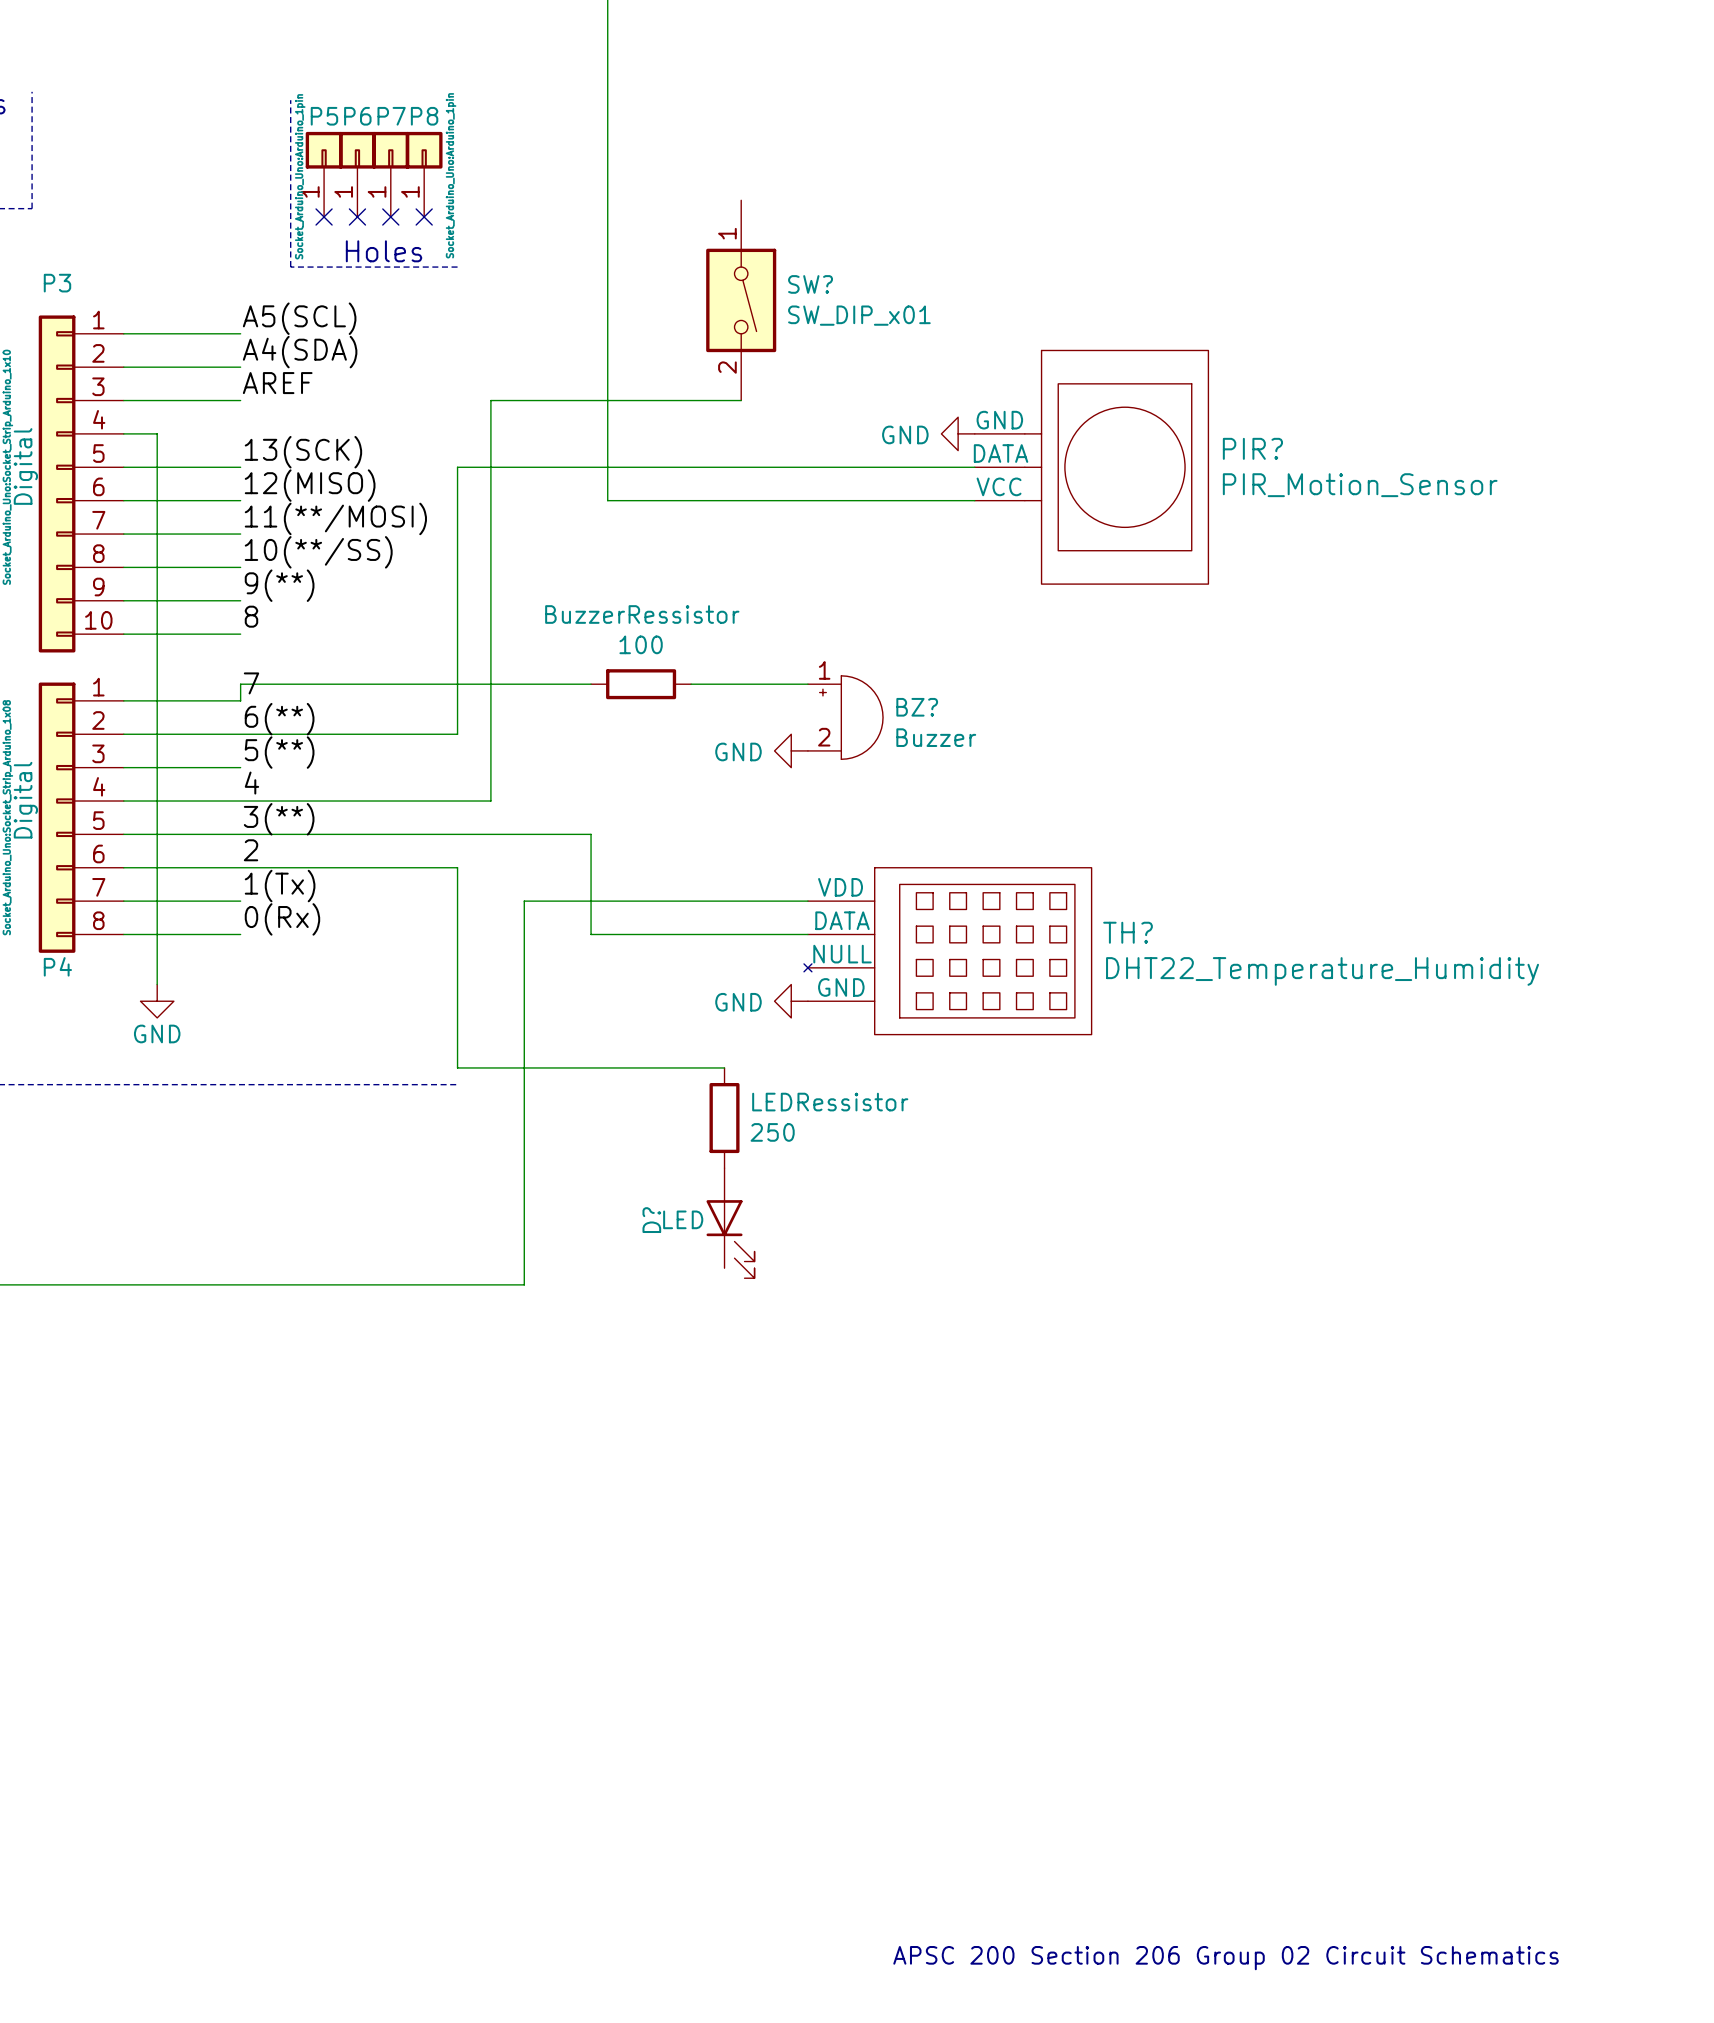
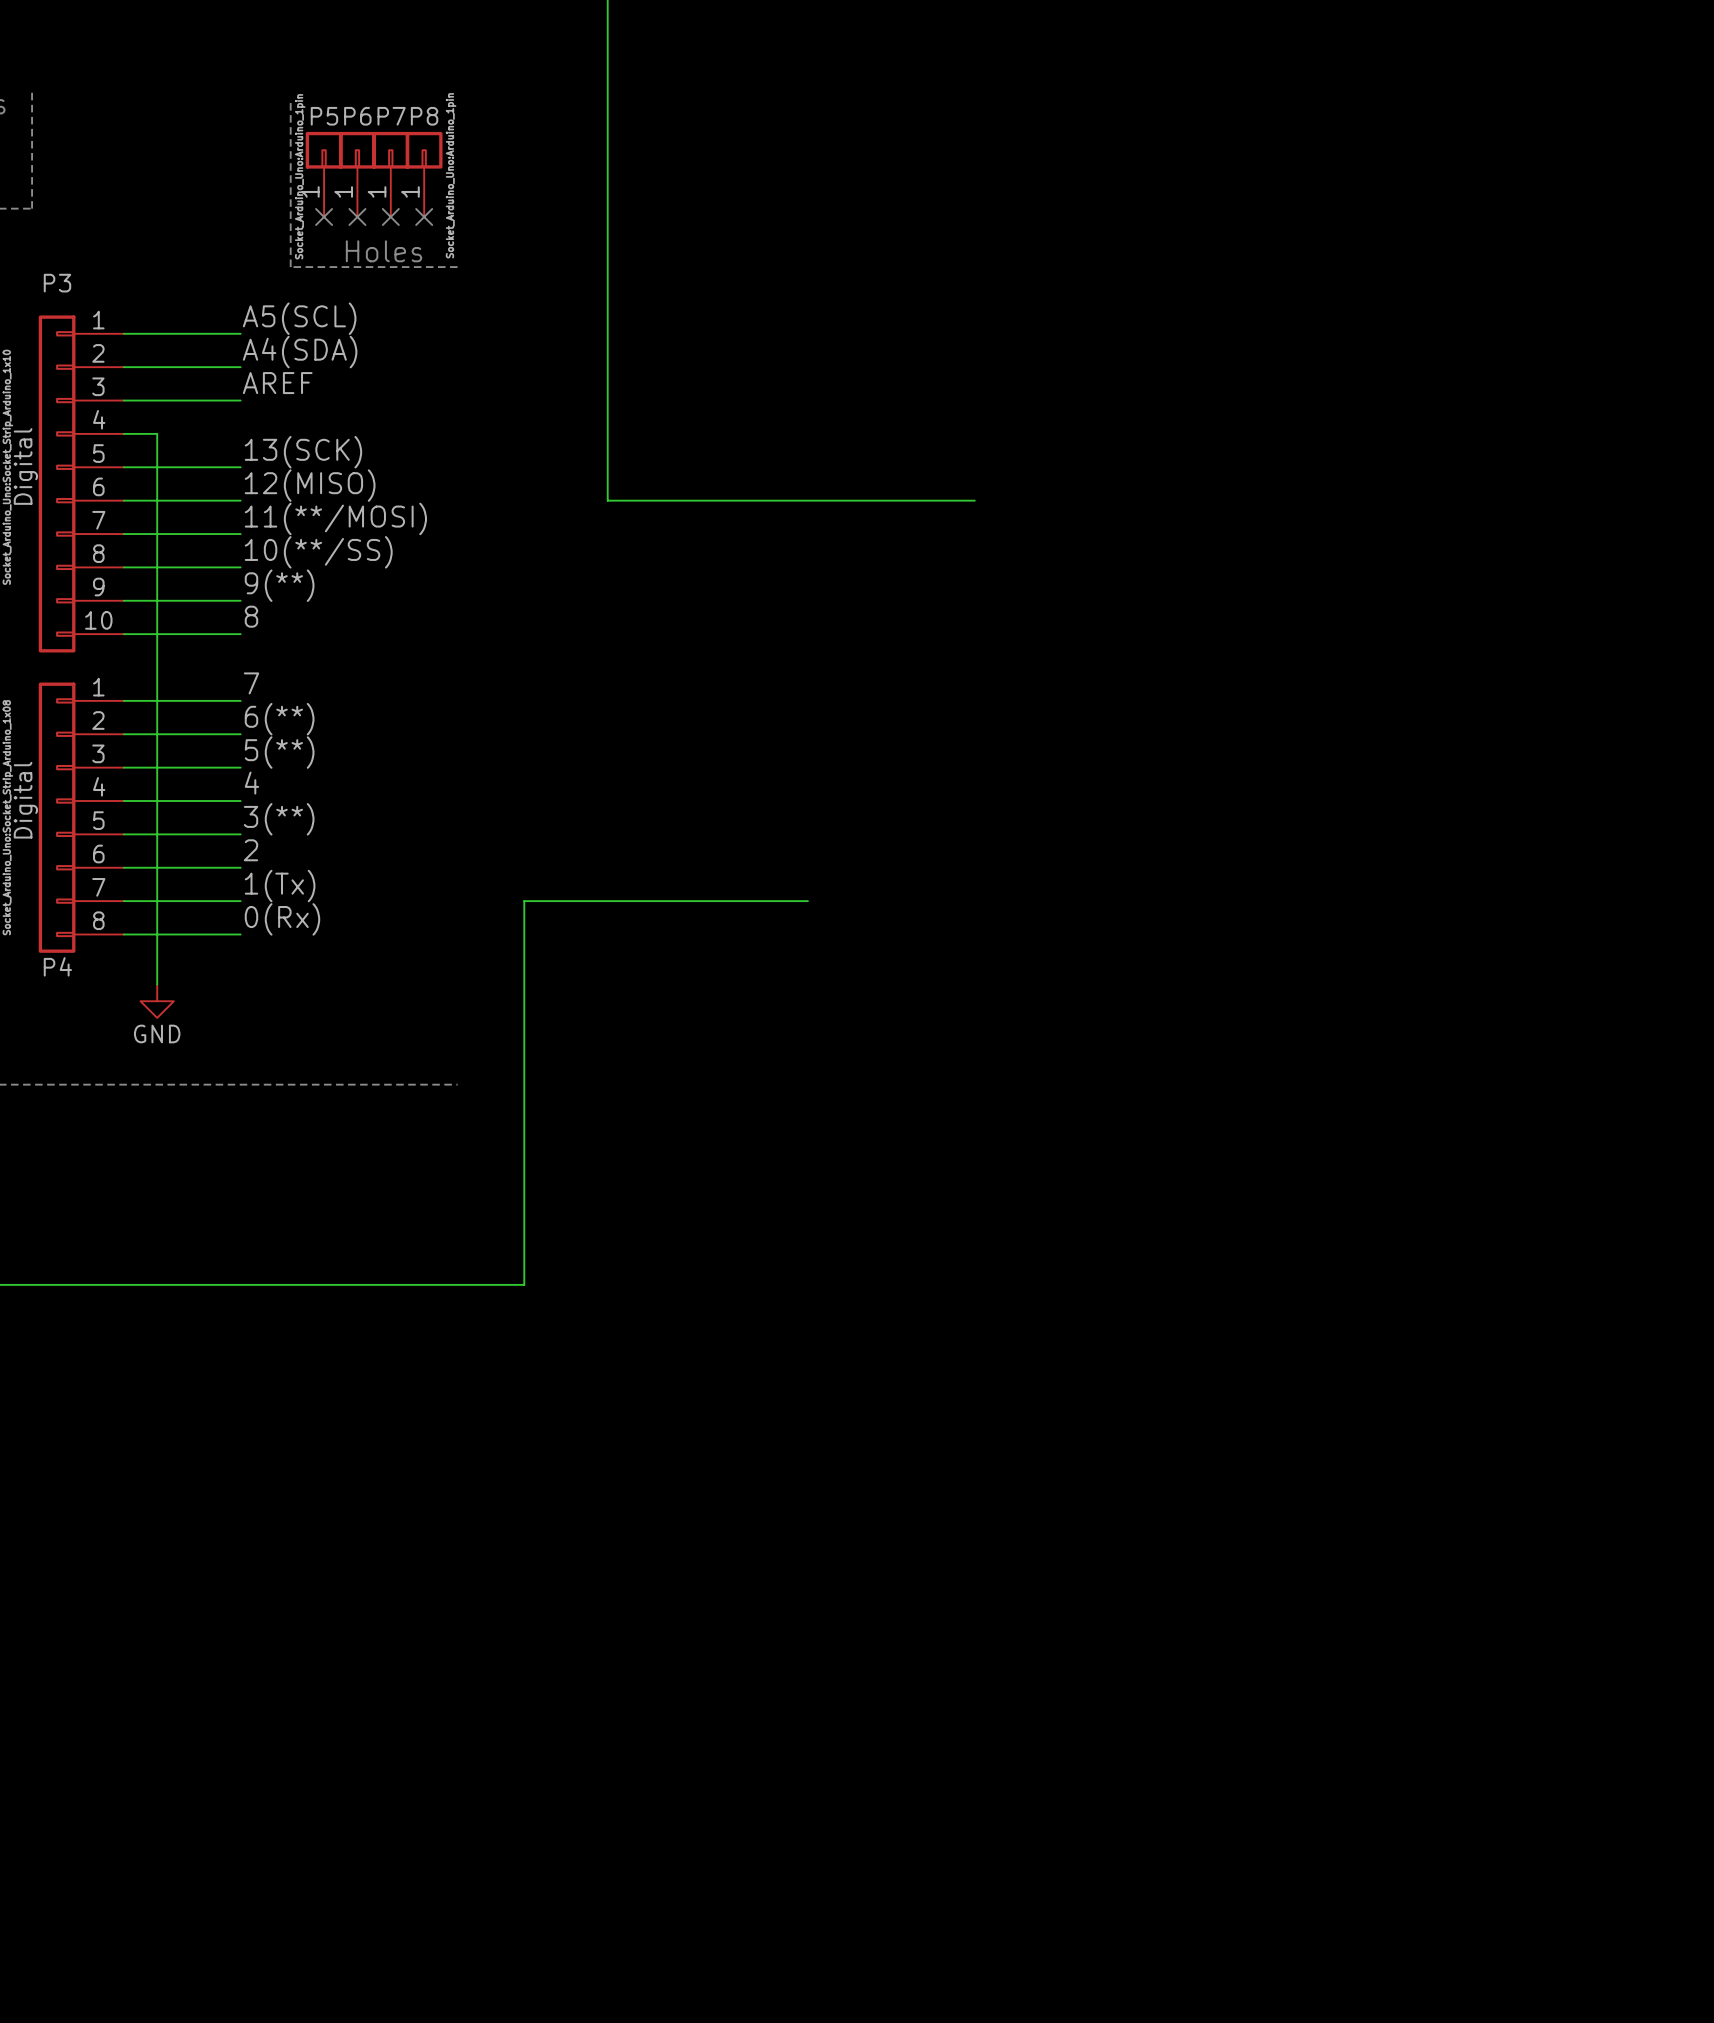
SW?: SW_DIP_x01 (741, 300) -> none
wire: (741, 400) (490, 400) (490, 801) (240, 801) -> none
power symbol: GND (958, 433) -> none
wire: (974, 467) (457, 467) (457, 734) (240, 734) -> none
PIR?: PIR_Motion_Sensor (1091, 467) -> none
wire: (591, 684) (240, 684) (240, 700) -> none
BuzzerRessistor: 100 (641, 684) -> none
wire: (691, 684) (807, 684) -> none
BZ?: Buzzer (845, 717) -> none
power symbol: GND (791, 750) -> none
wire: (240, 834) (591, 834) (591, 934) (807, 934) -> none
wire: (240, 867) (457, 867) (457, 1067) (724, 1067) -> none
TH?: DHT22_Temperature_Humidity (947, 951) -> none
power symbol: GND (791, 1001) -> none
LEDRessistor: 250 (724, 1118) -> none
D?: LED (730, 1223) -> none
text: APSC 200 Section 206 Group 02 Circuit Schematics (1226, 1958) -> none

